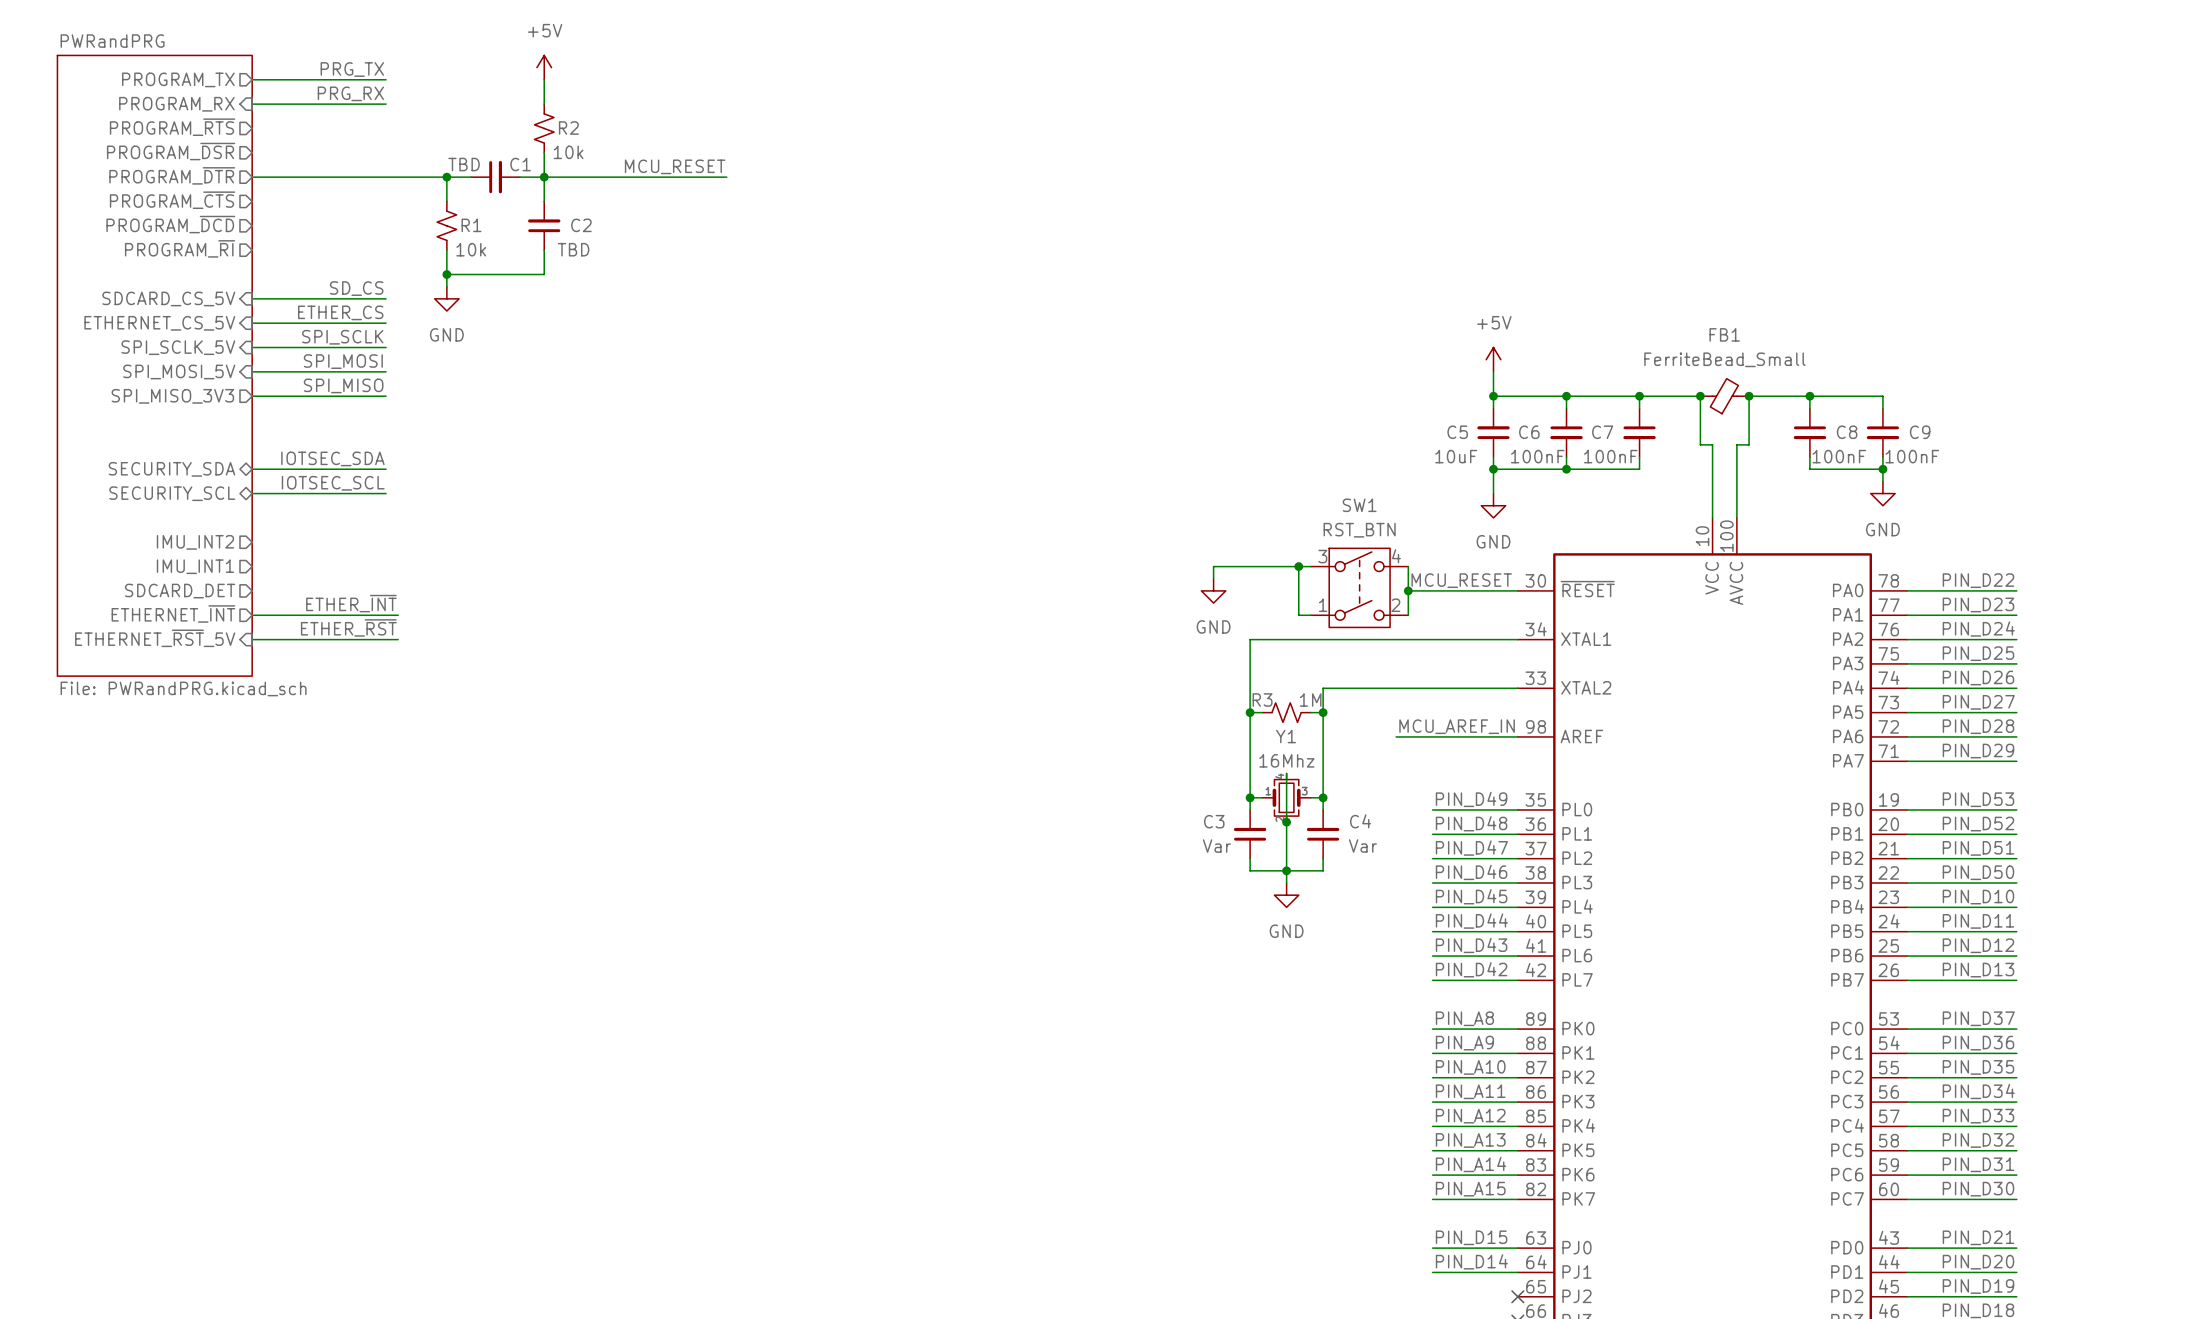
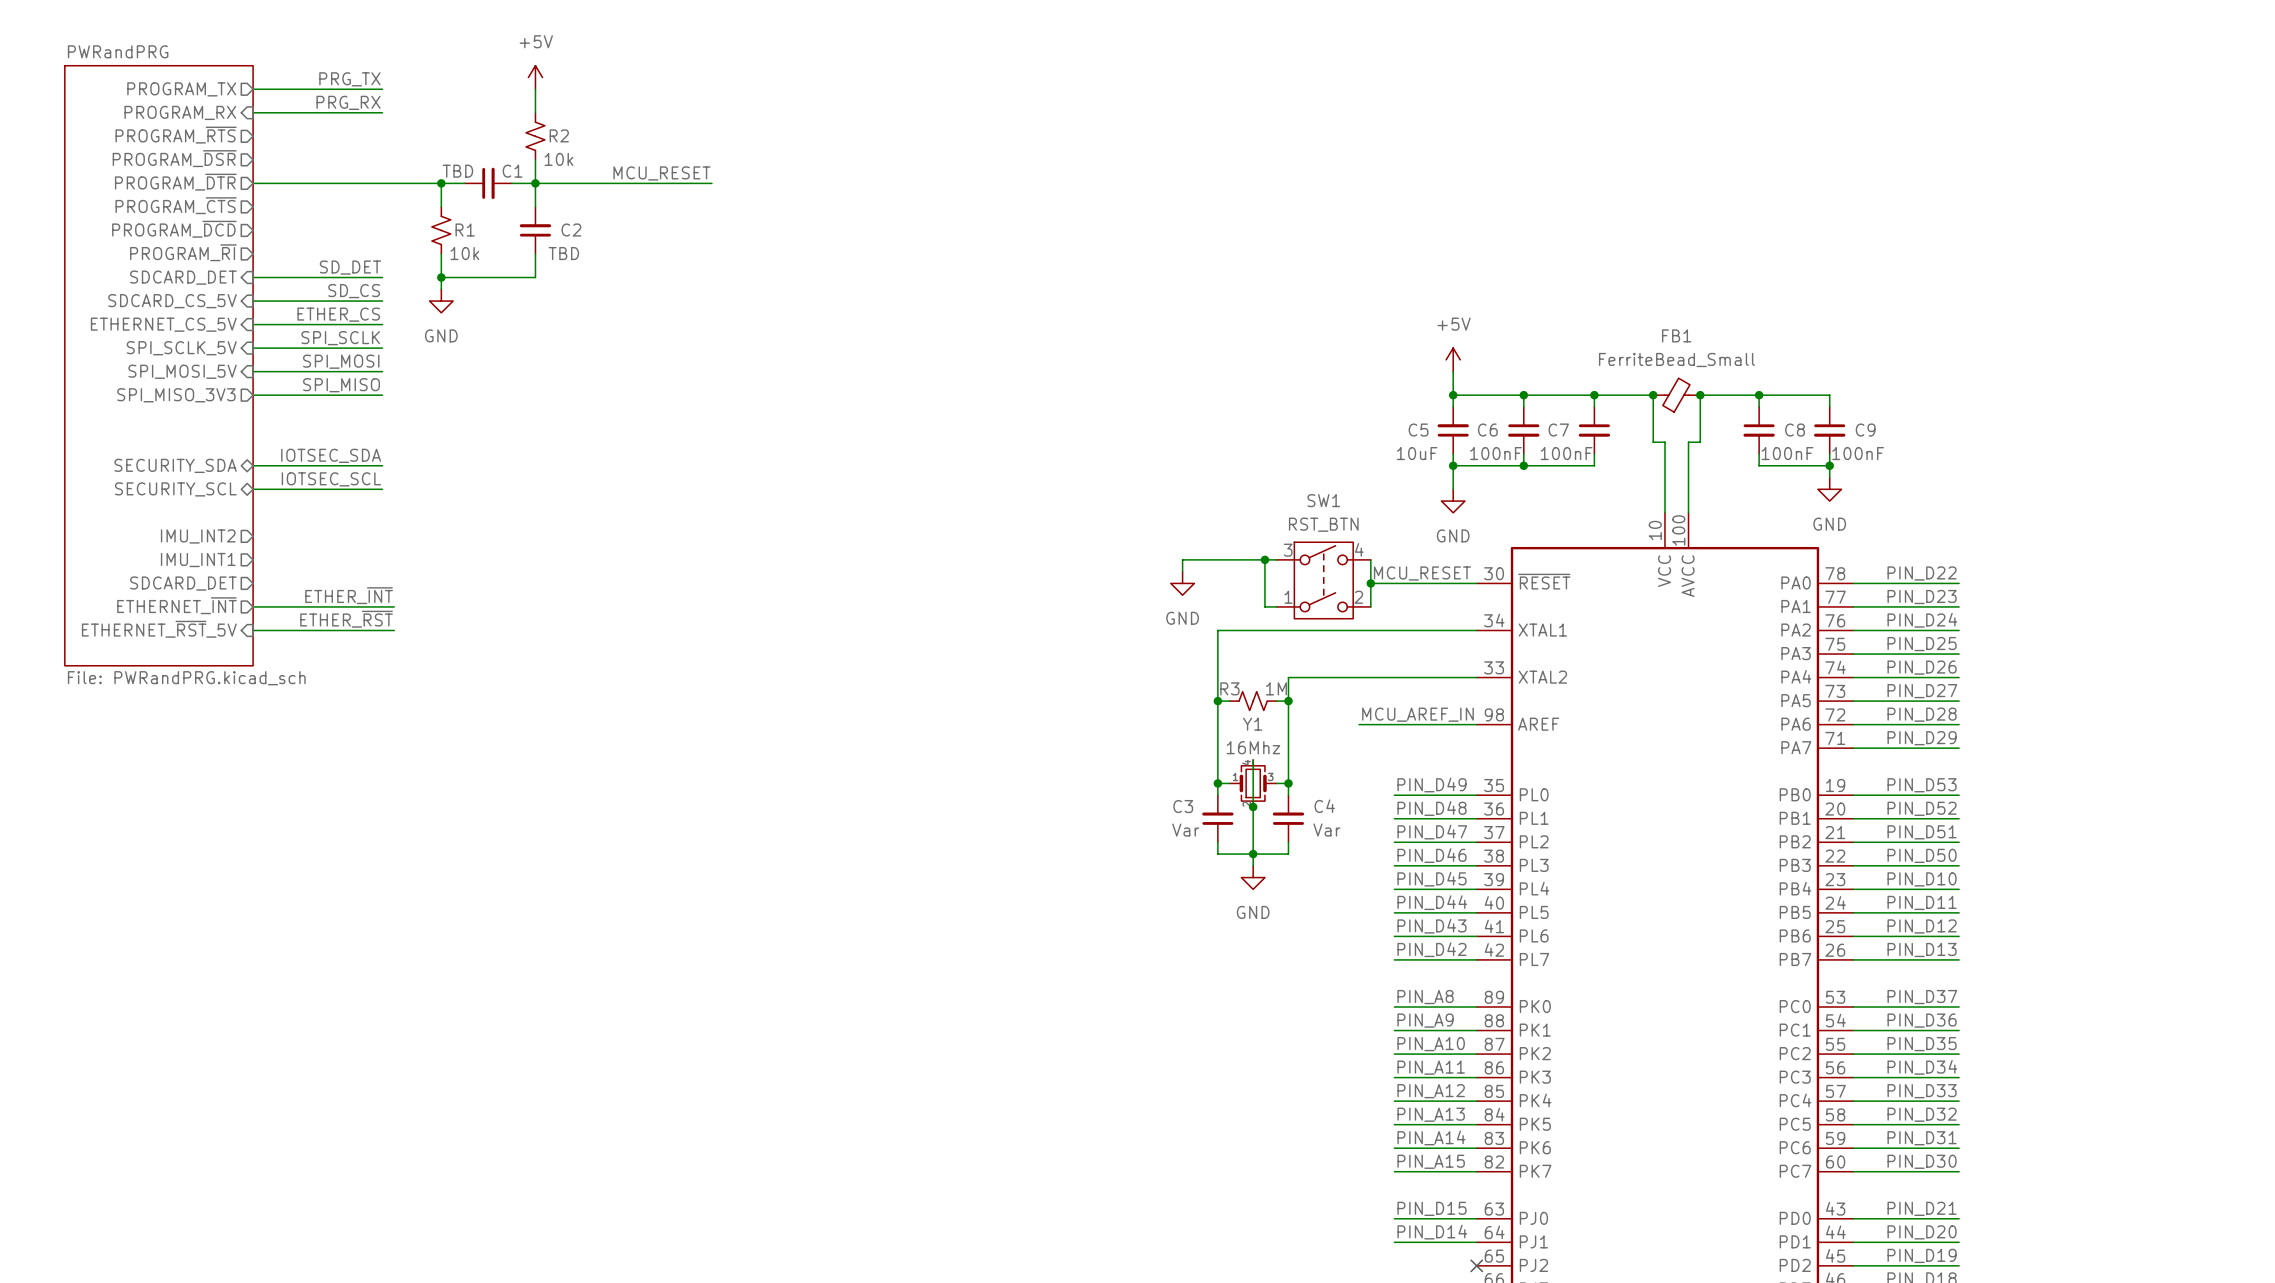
label: none -> SD_DET (350, 267)
sheet pin: none -> SDCARD_DET (183, 277)
wire: none -> (253, 277) (382, 277)

